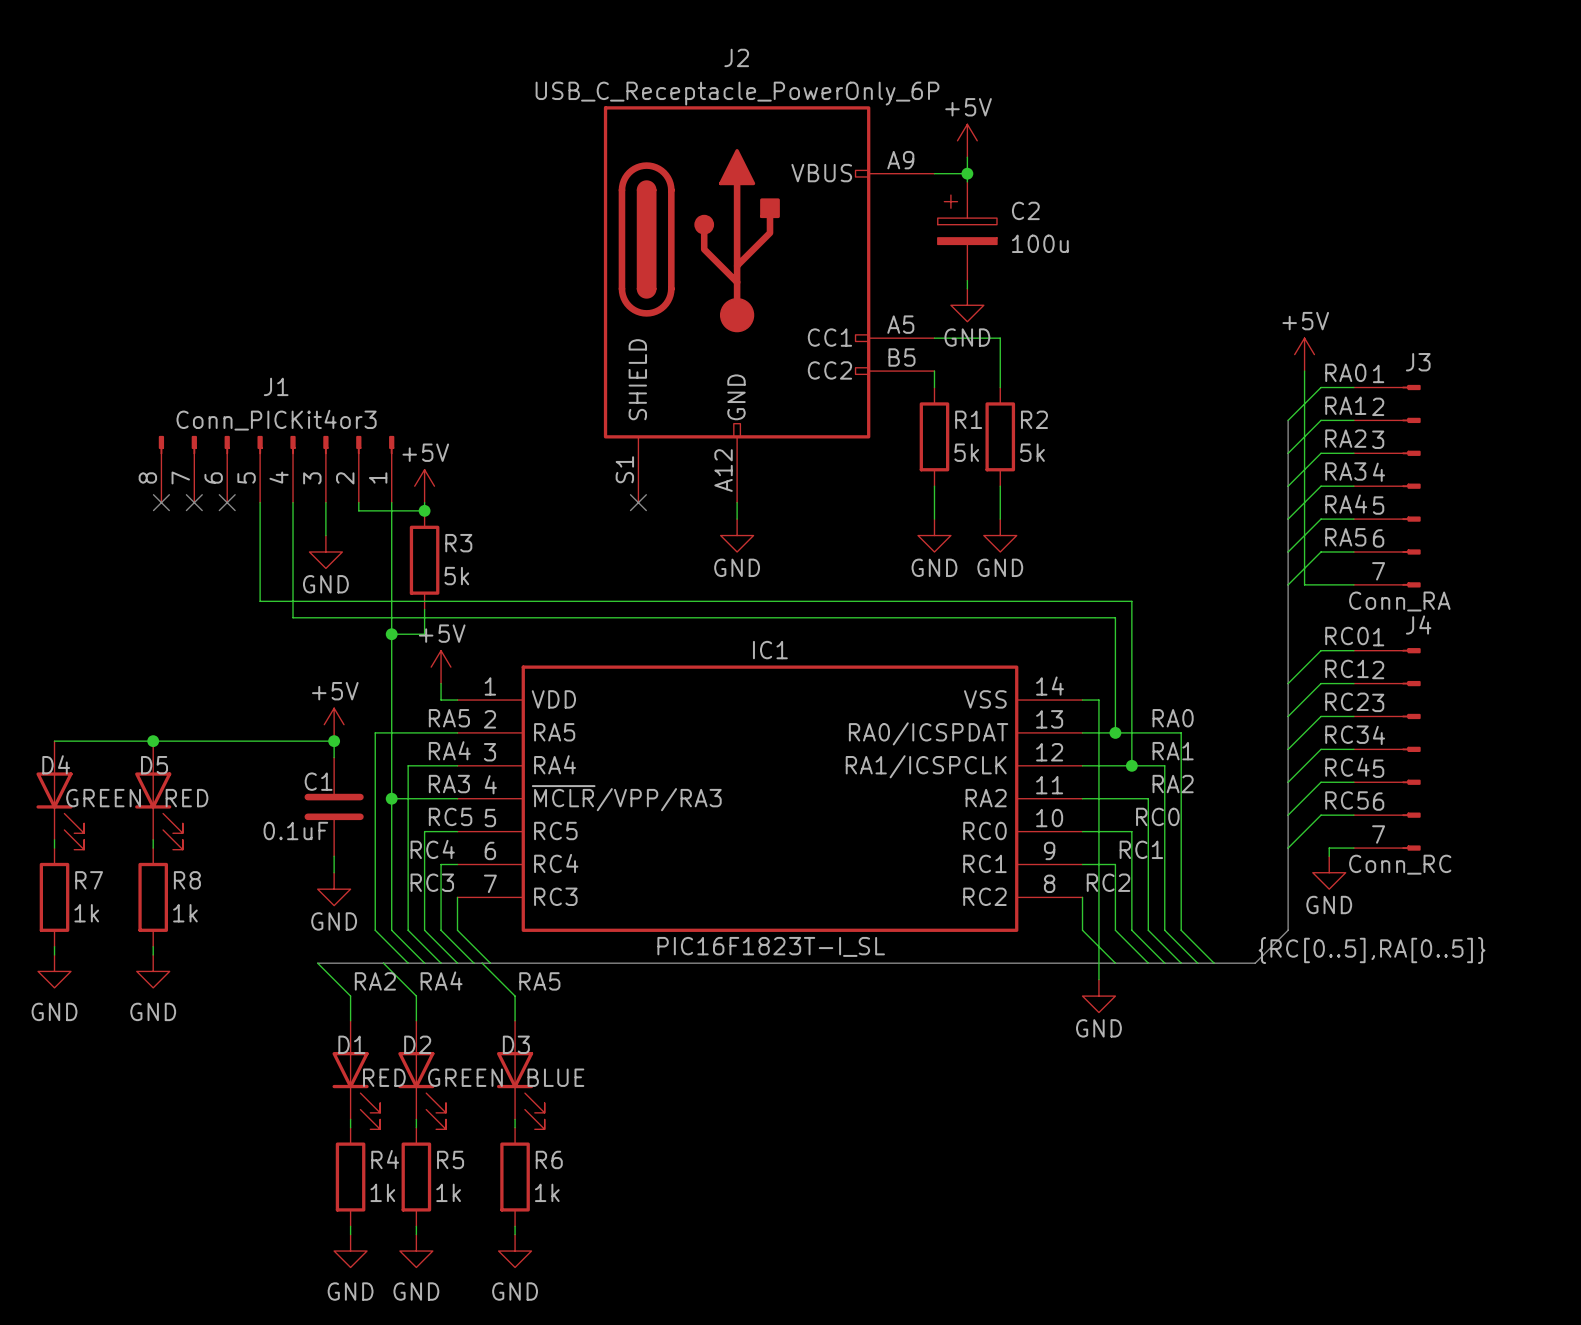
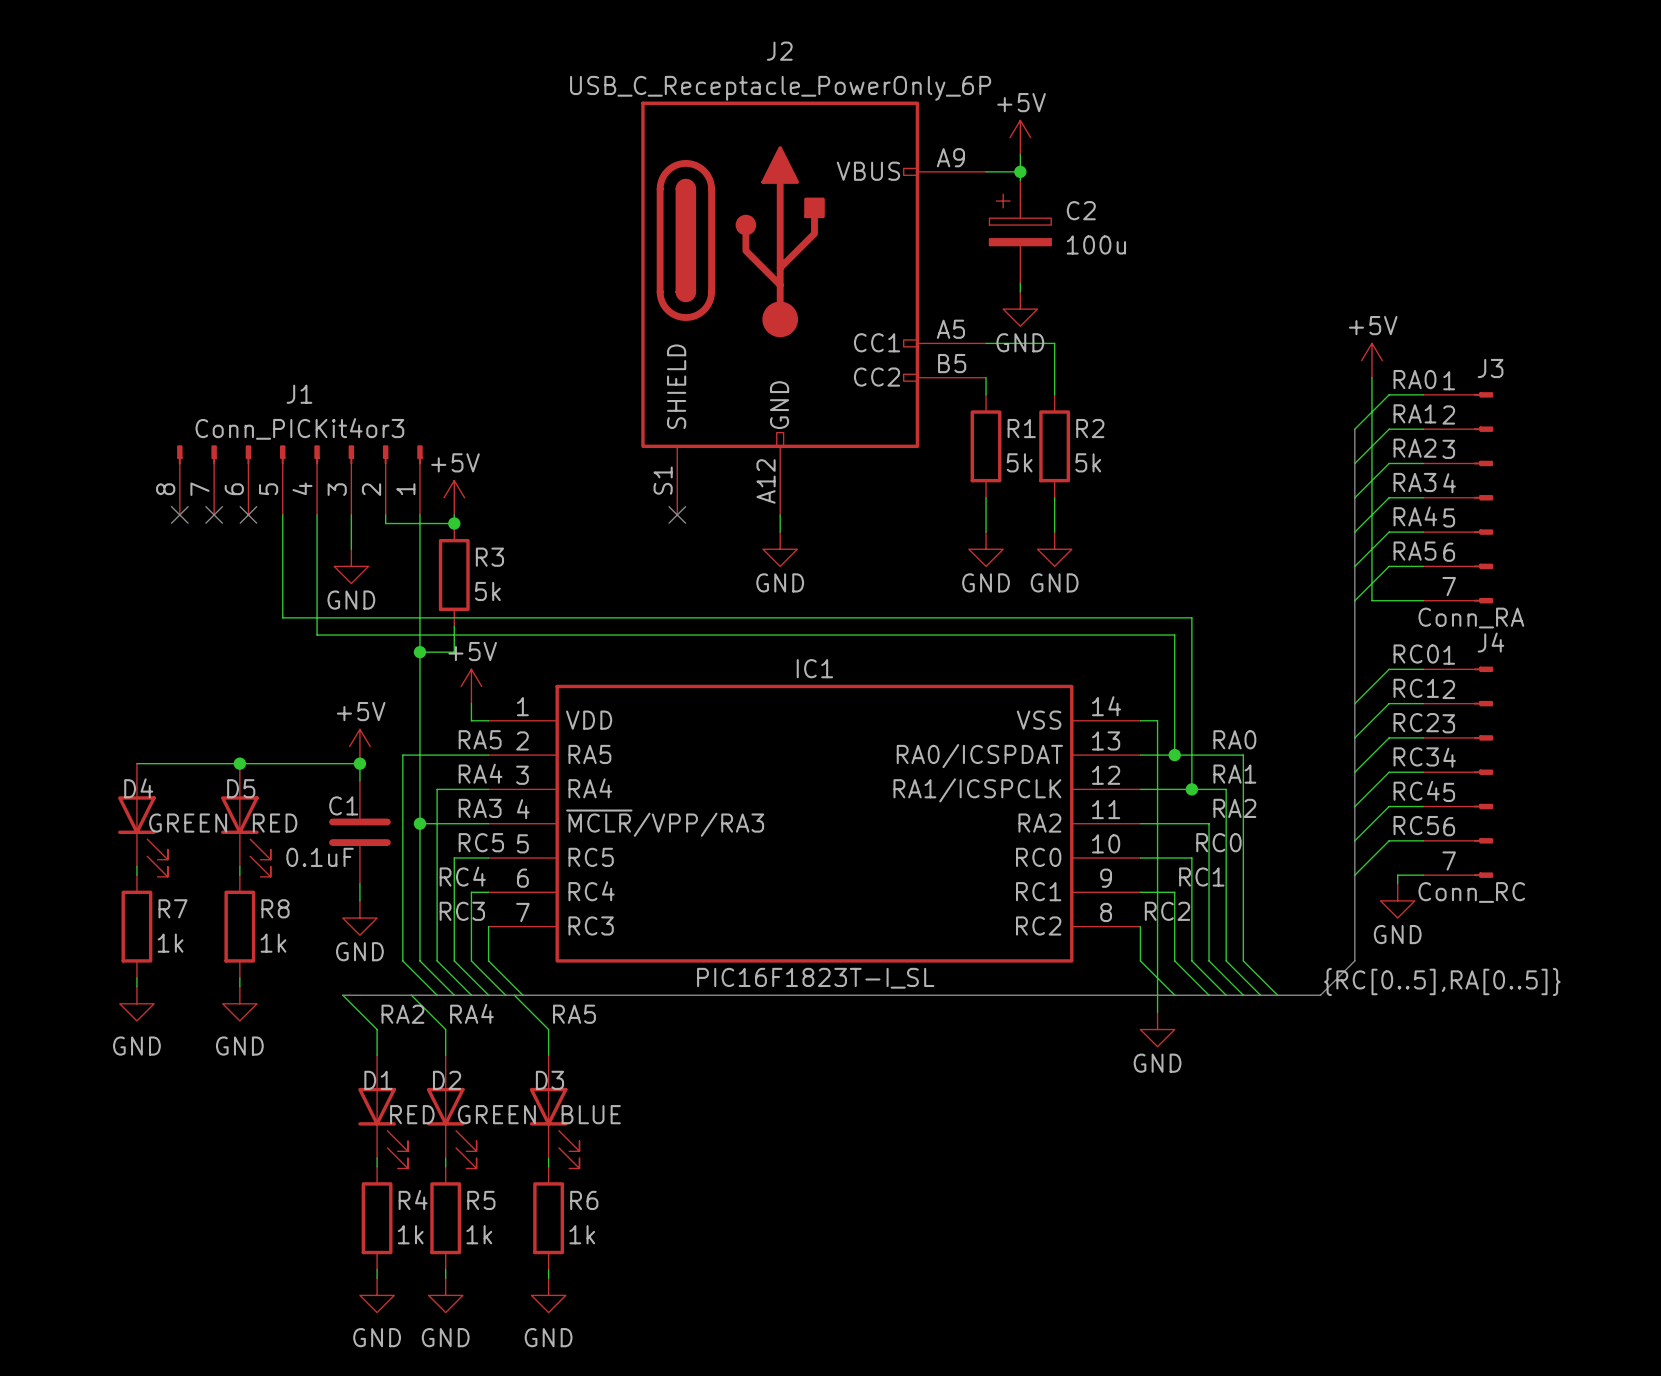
wire: (54, 741) (120, 741) -> none
junction position: (153, 741) -> (239, 763)
D4 position: (60, 795) -> (142, 820)
D5 position: (158, 795) -> (245, 820)
wire: (54, 839) (54, 848) -> (136, 866) (136, 875)
wire: (153, 839) (153, 848) -> (239, 866) (239, 875)
R7 position: (54, 897) -> (136, 926)
R8 position: (153, 897) -> (239, 926)
wire: (54, 946) (54, 954) -> (136, 978) (136, 986)
wire: (153, 946) (153, 954) -> (239, 978) (239, 986)
power symbol: GND (54, 971) -> none
power symbol: none -> GND (136, 1003)
power symbol: GND (153, 971) -> none
power symbol: none -> GND (239, 1003)

